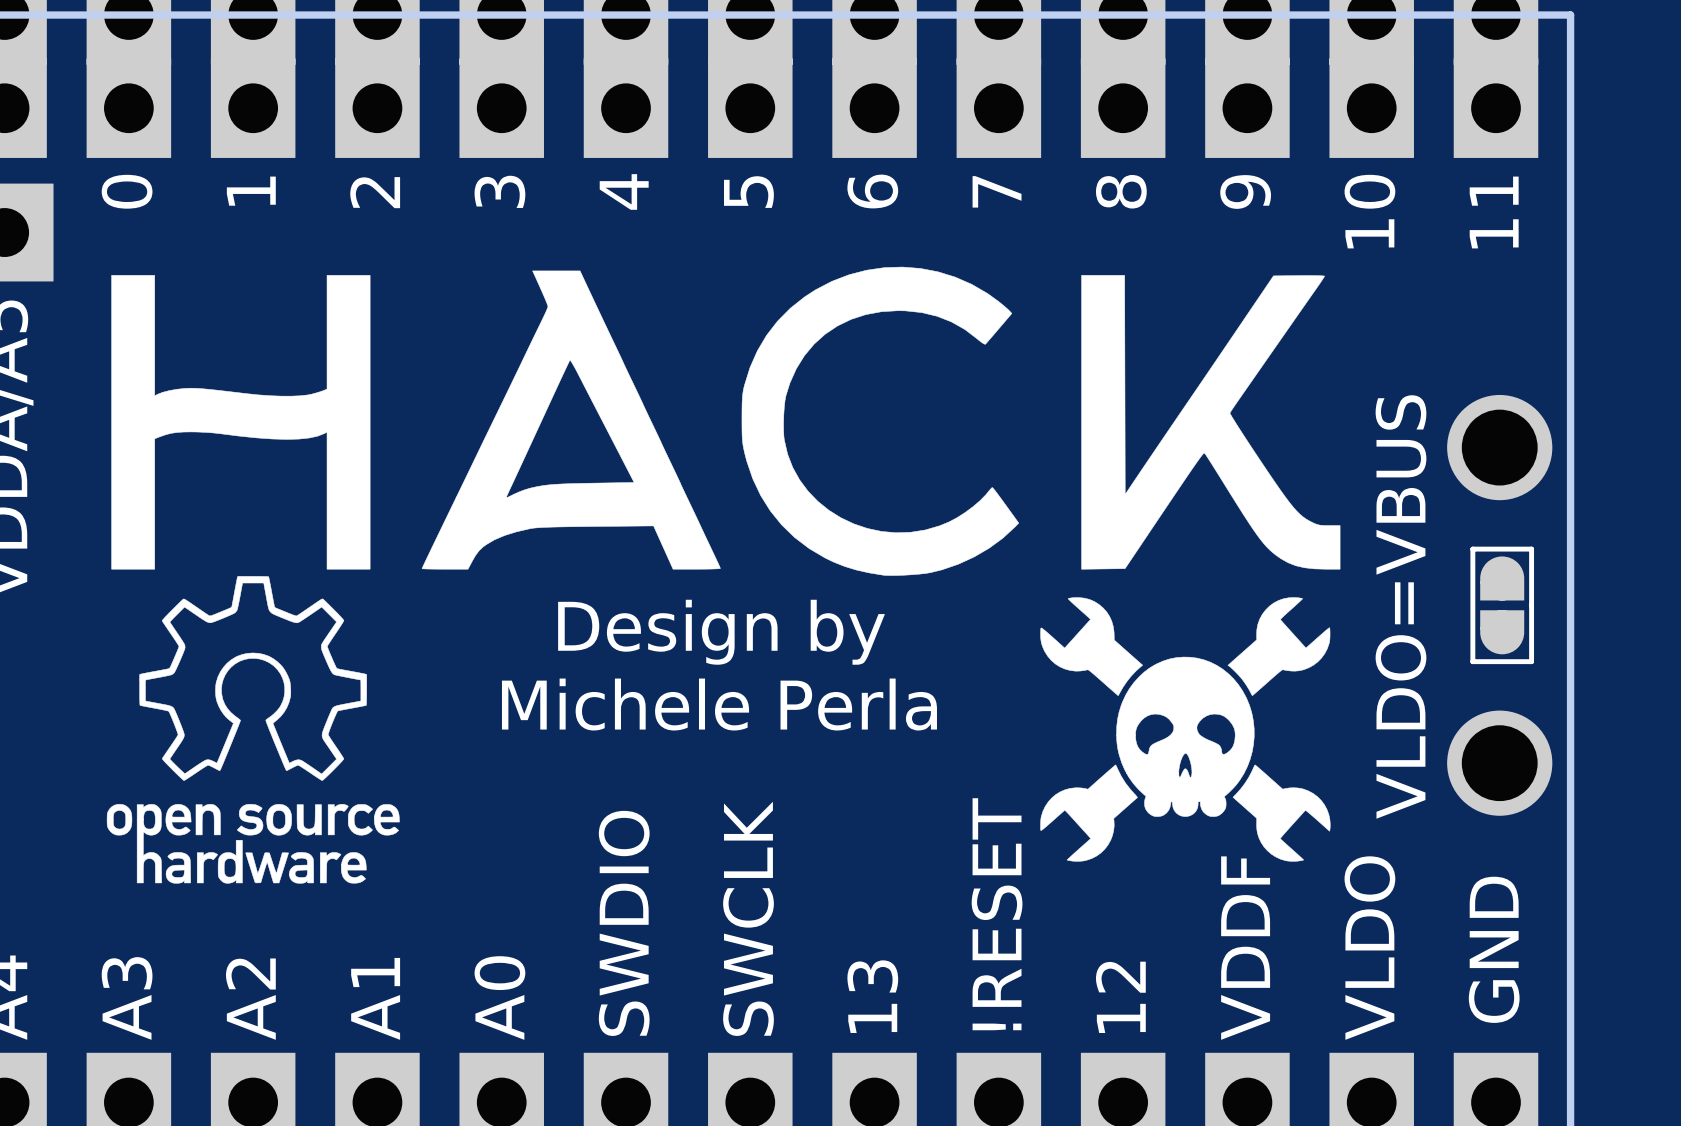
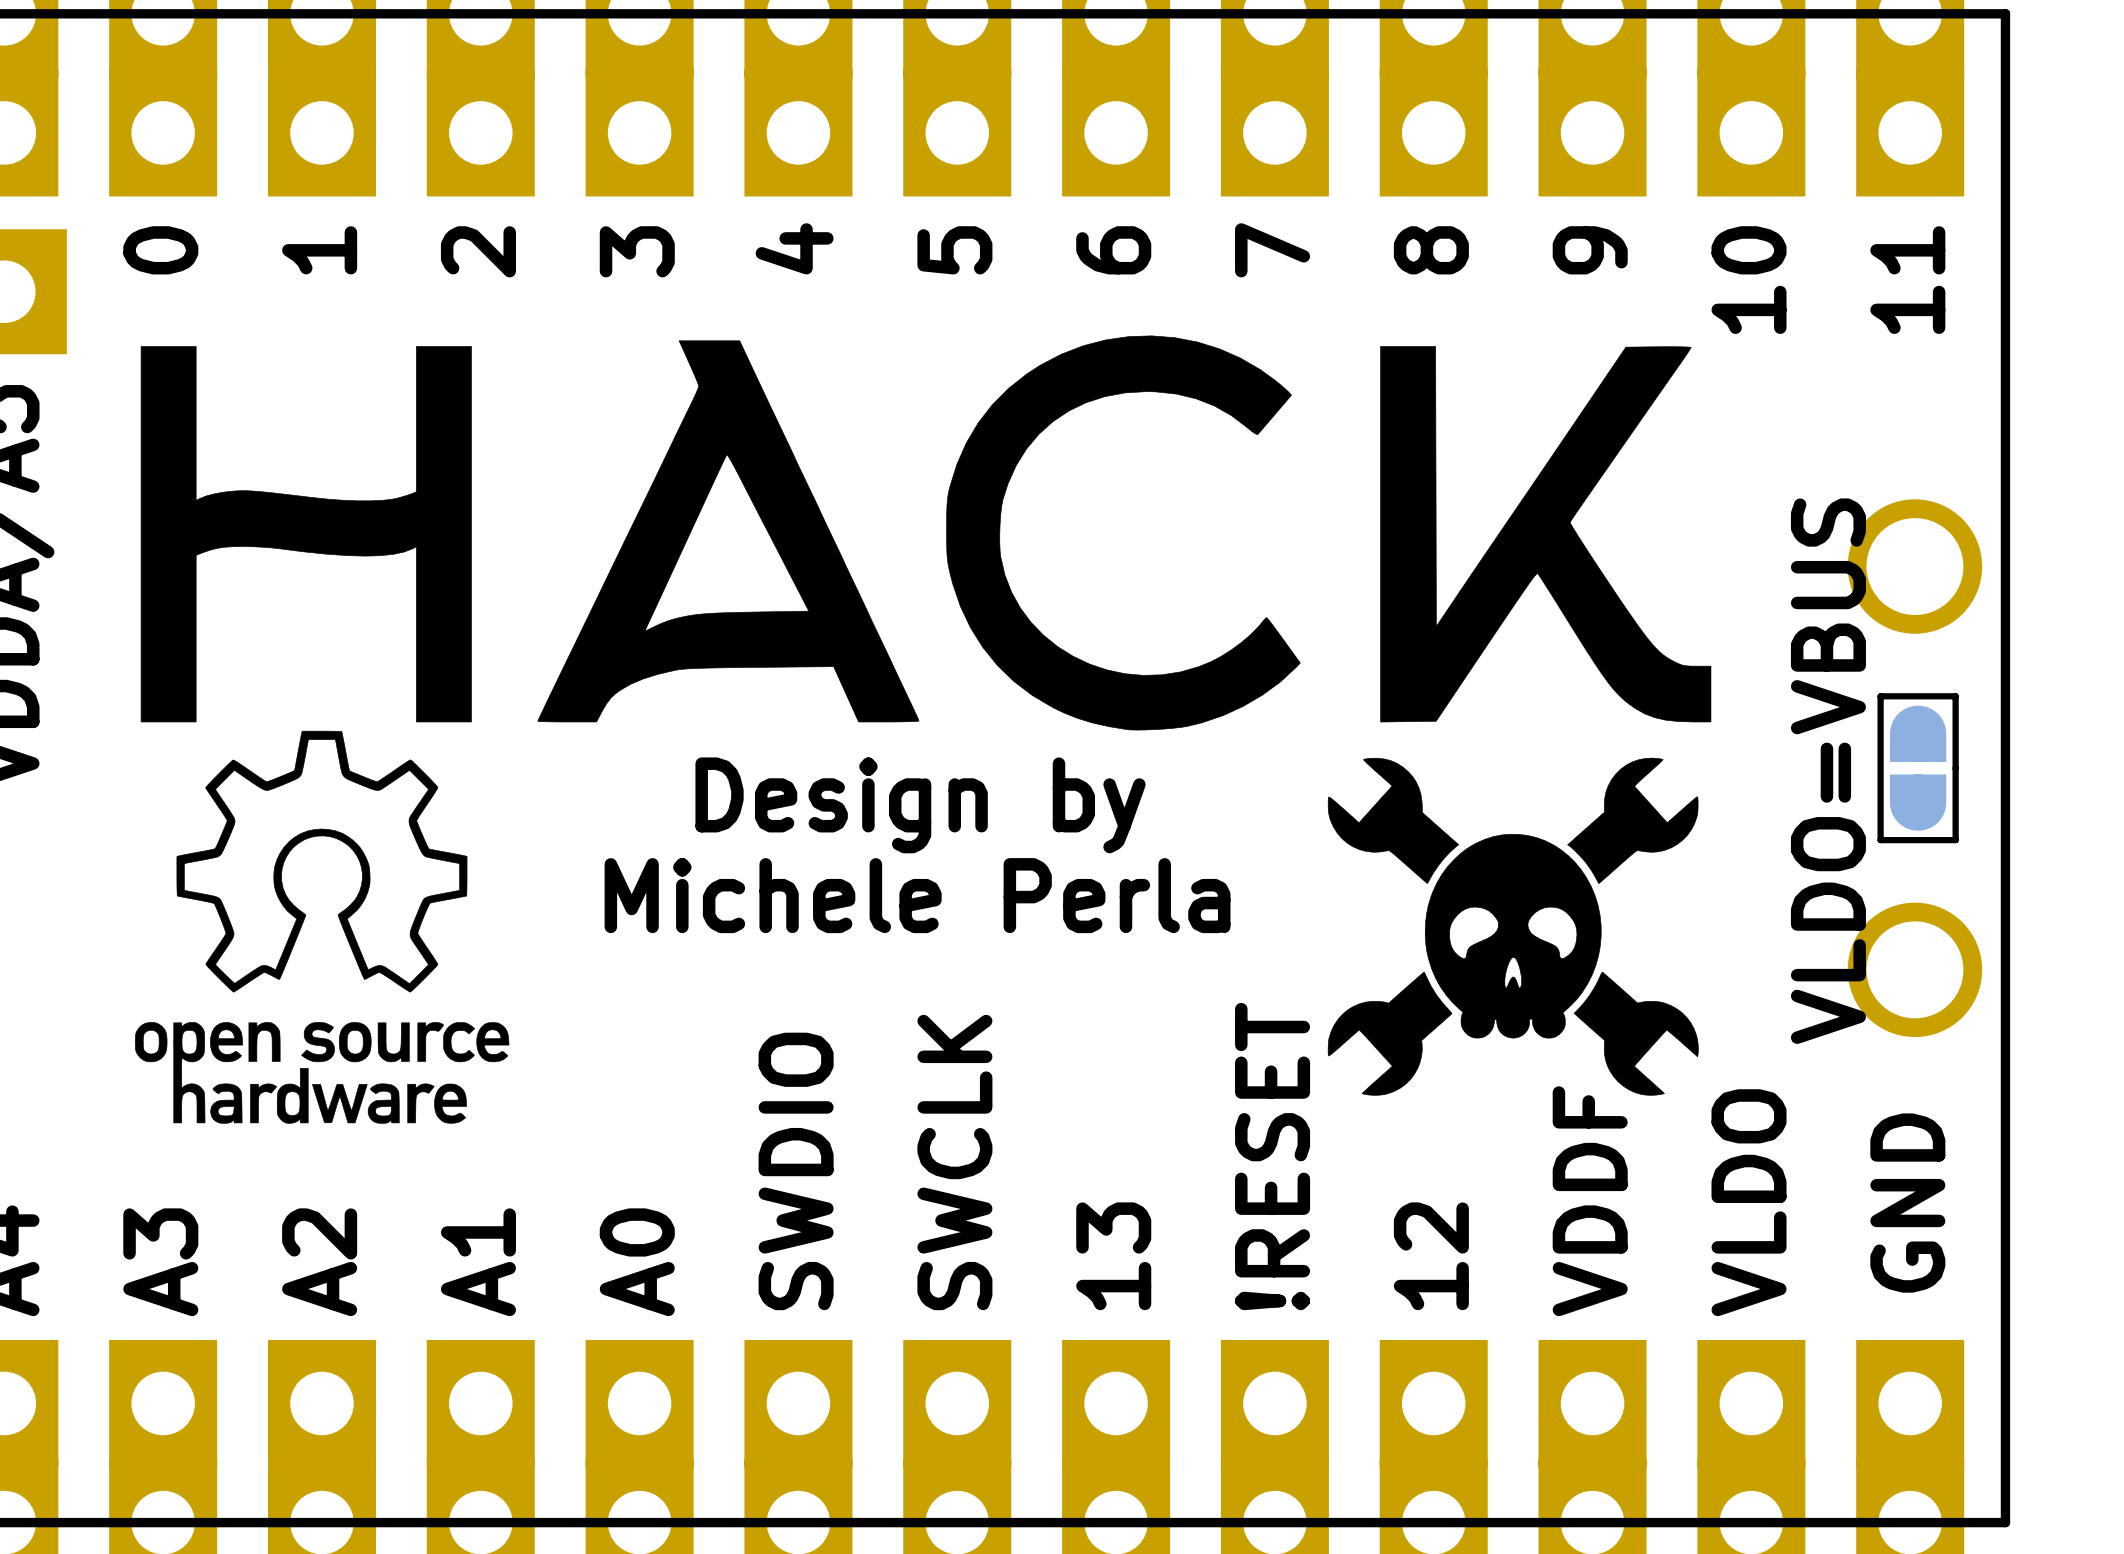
text position: VLDO=VBUS (1400, 606) -> VLDO=VBUS (1828, 771)

